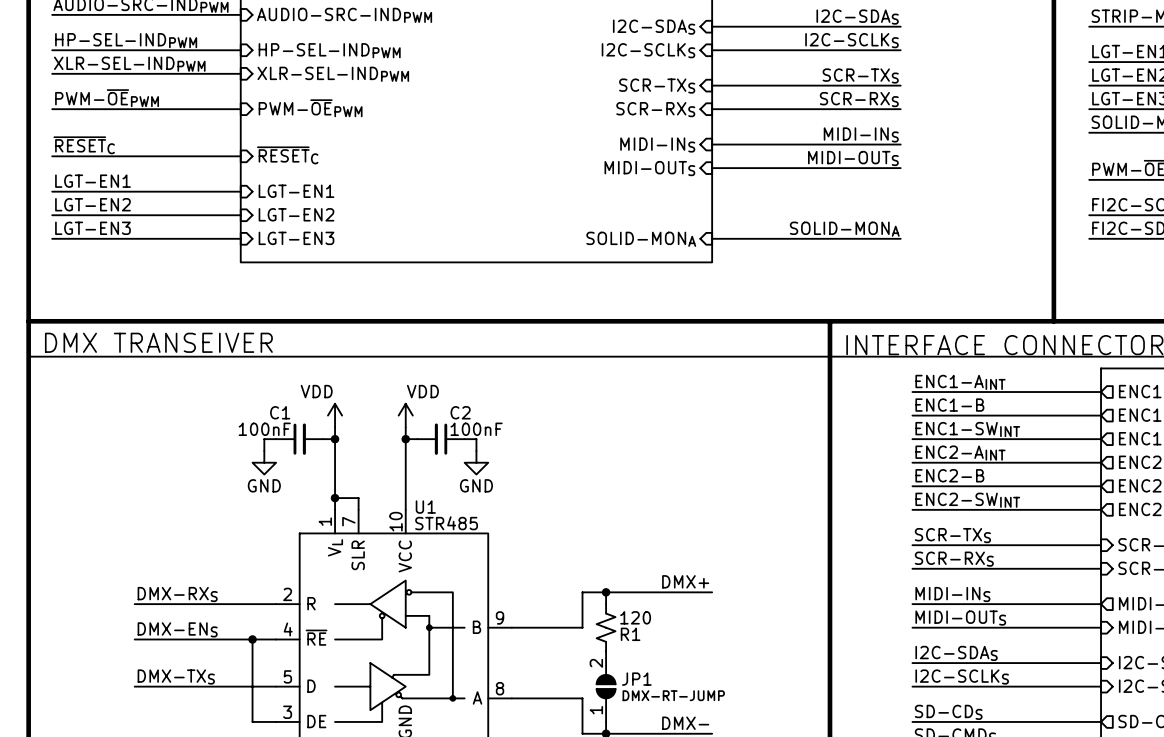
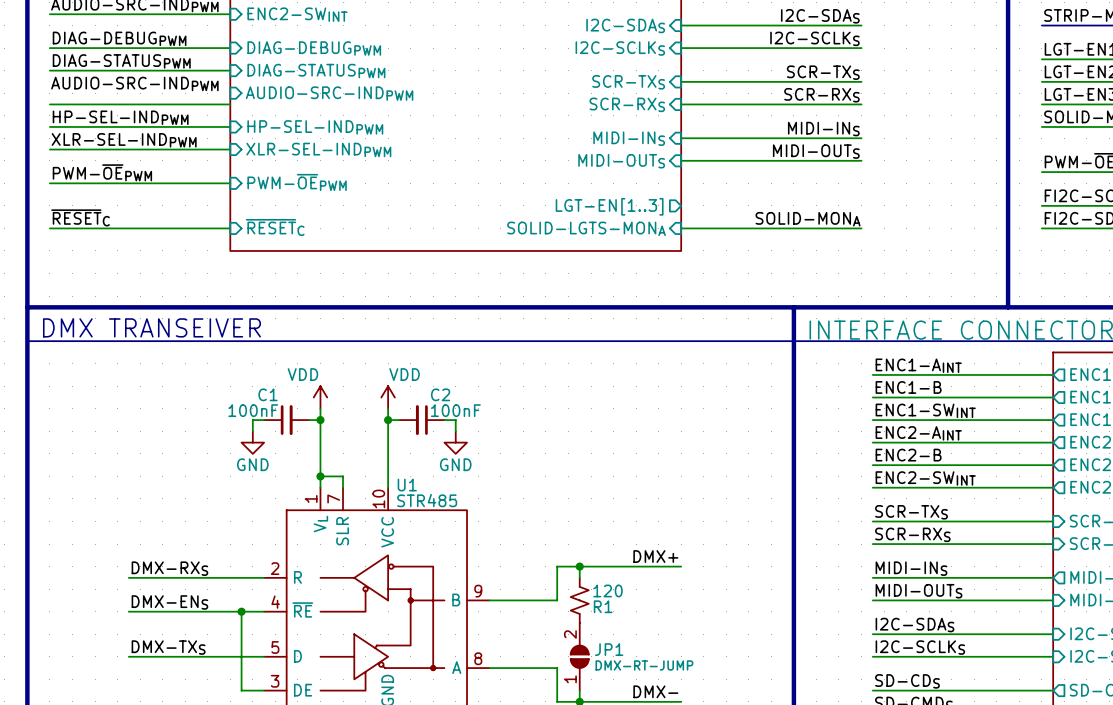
sheet pin: AUDIO-SRC-INDPWM (344, 15) -> ENC2-SWINT (297, 14)
label: HP-SEL-INDPWM (126, 40) -> DIAG-DEBUGPWM (119, 38)
sheet pin: HP-SEL-INDPWM (329, 50) -> DIAG-DEBUGPWM (314, 48)
label: XLR-SEL-INDPWM (129, 64) -> DIAG-STATUSPWM (121, 61)
sheet pin: XLR-SEL-INDPWM (333, 74) -> DIAG-STATUSPWM (316, 71)
label: none -> AUDIO-SRC-INDPWM (134, 83)
sheet pin: none -> AUDIO-SRC-INDPWM (329, 93)
label: PWM-~{OE}PWM (107, 98) -> none
sheet pin: PWM-~{OE}PWM (310, 108) -> none
label: none -> HP-SEL-INDPWM (120, 117)
sheet pin: none -> HP-SEL-INDPWM (315, 127)
label: ~{RESET}C (84, 145) -> XLR-SEL-INDPWM (124, 140)
sheet pin: ~{RESET}C (287, 155) -> XLR-SEL-INDPWM (318, 149)
label: LGT-EN1 (92, 181) -> PWM-~{OE}PWM (102, 172)
sheet pin: LGT-EN1 (296, 191) -> PWM-~{OE}PWM (297, 182)
label: LGT-EN2 (92, 204) -> none
sheet pin: LGT-EN2 (296, 214) -> none
wire: (52, 215) (240, 215) -> (49, 126) (230, 126)
sheet pin: none -> LGT-EN[1..3] (609, 206)
label: LGT-EN3 (92, 228) -> ~{RESET}C (80, 217)
sheet pin: LGT-EN3 (296, 238) -> ~{RESET}C (275, 227)
sheet pin: SOLID-MONA (641, 239) -> SOLID-LGTS-MONA (586, 228)

